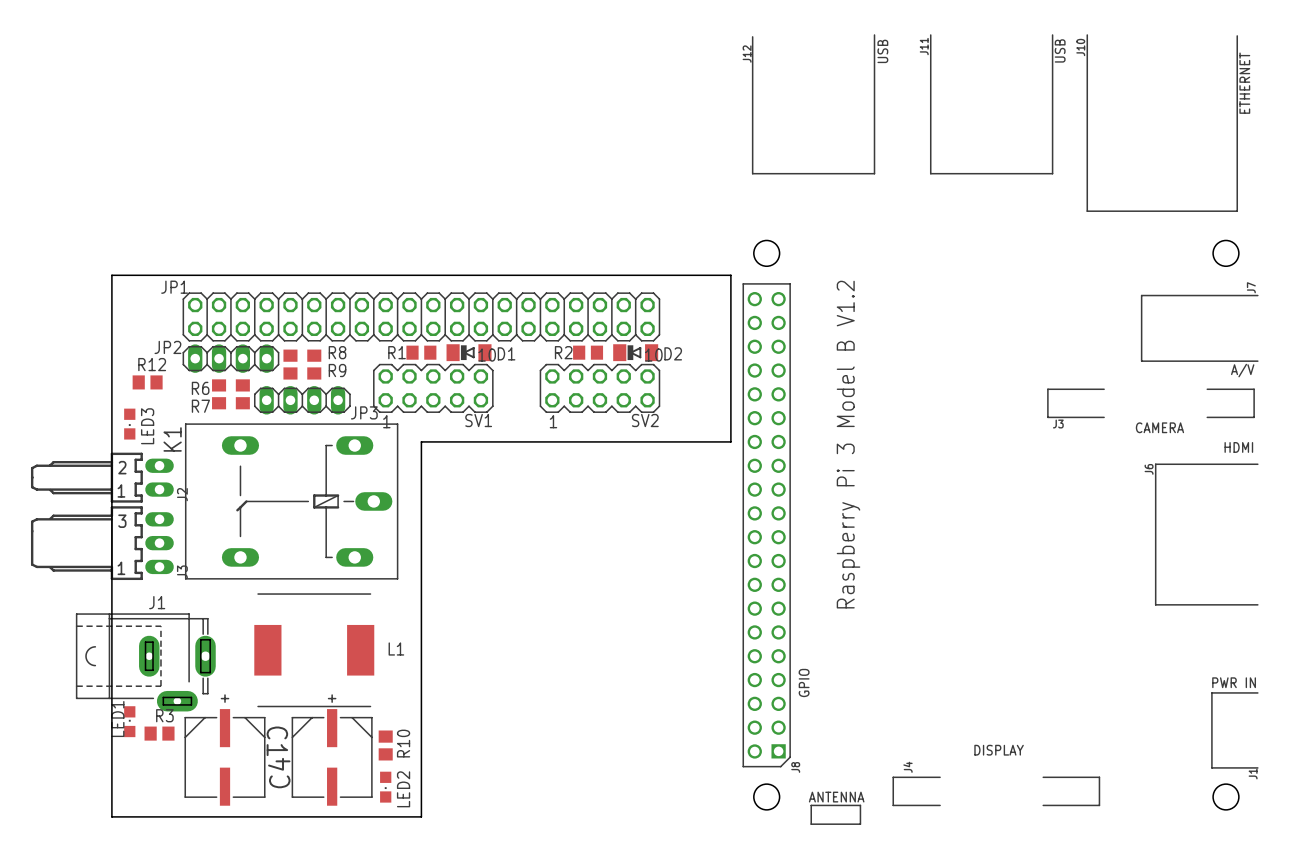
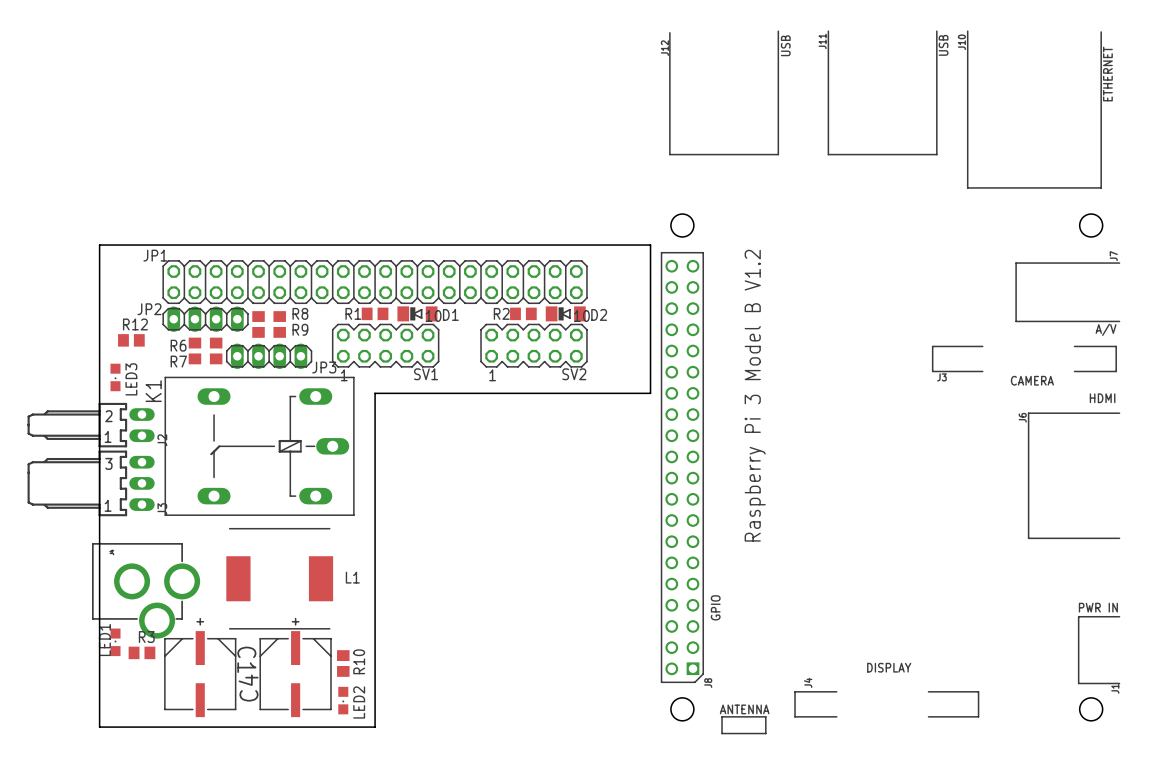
J1: (145, 662) -> none
part: none -> (146, 590)

